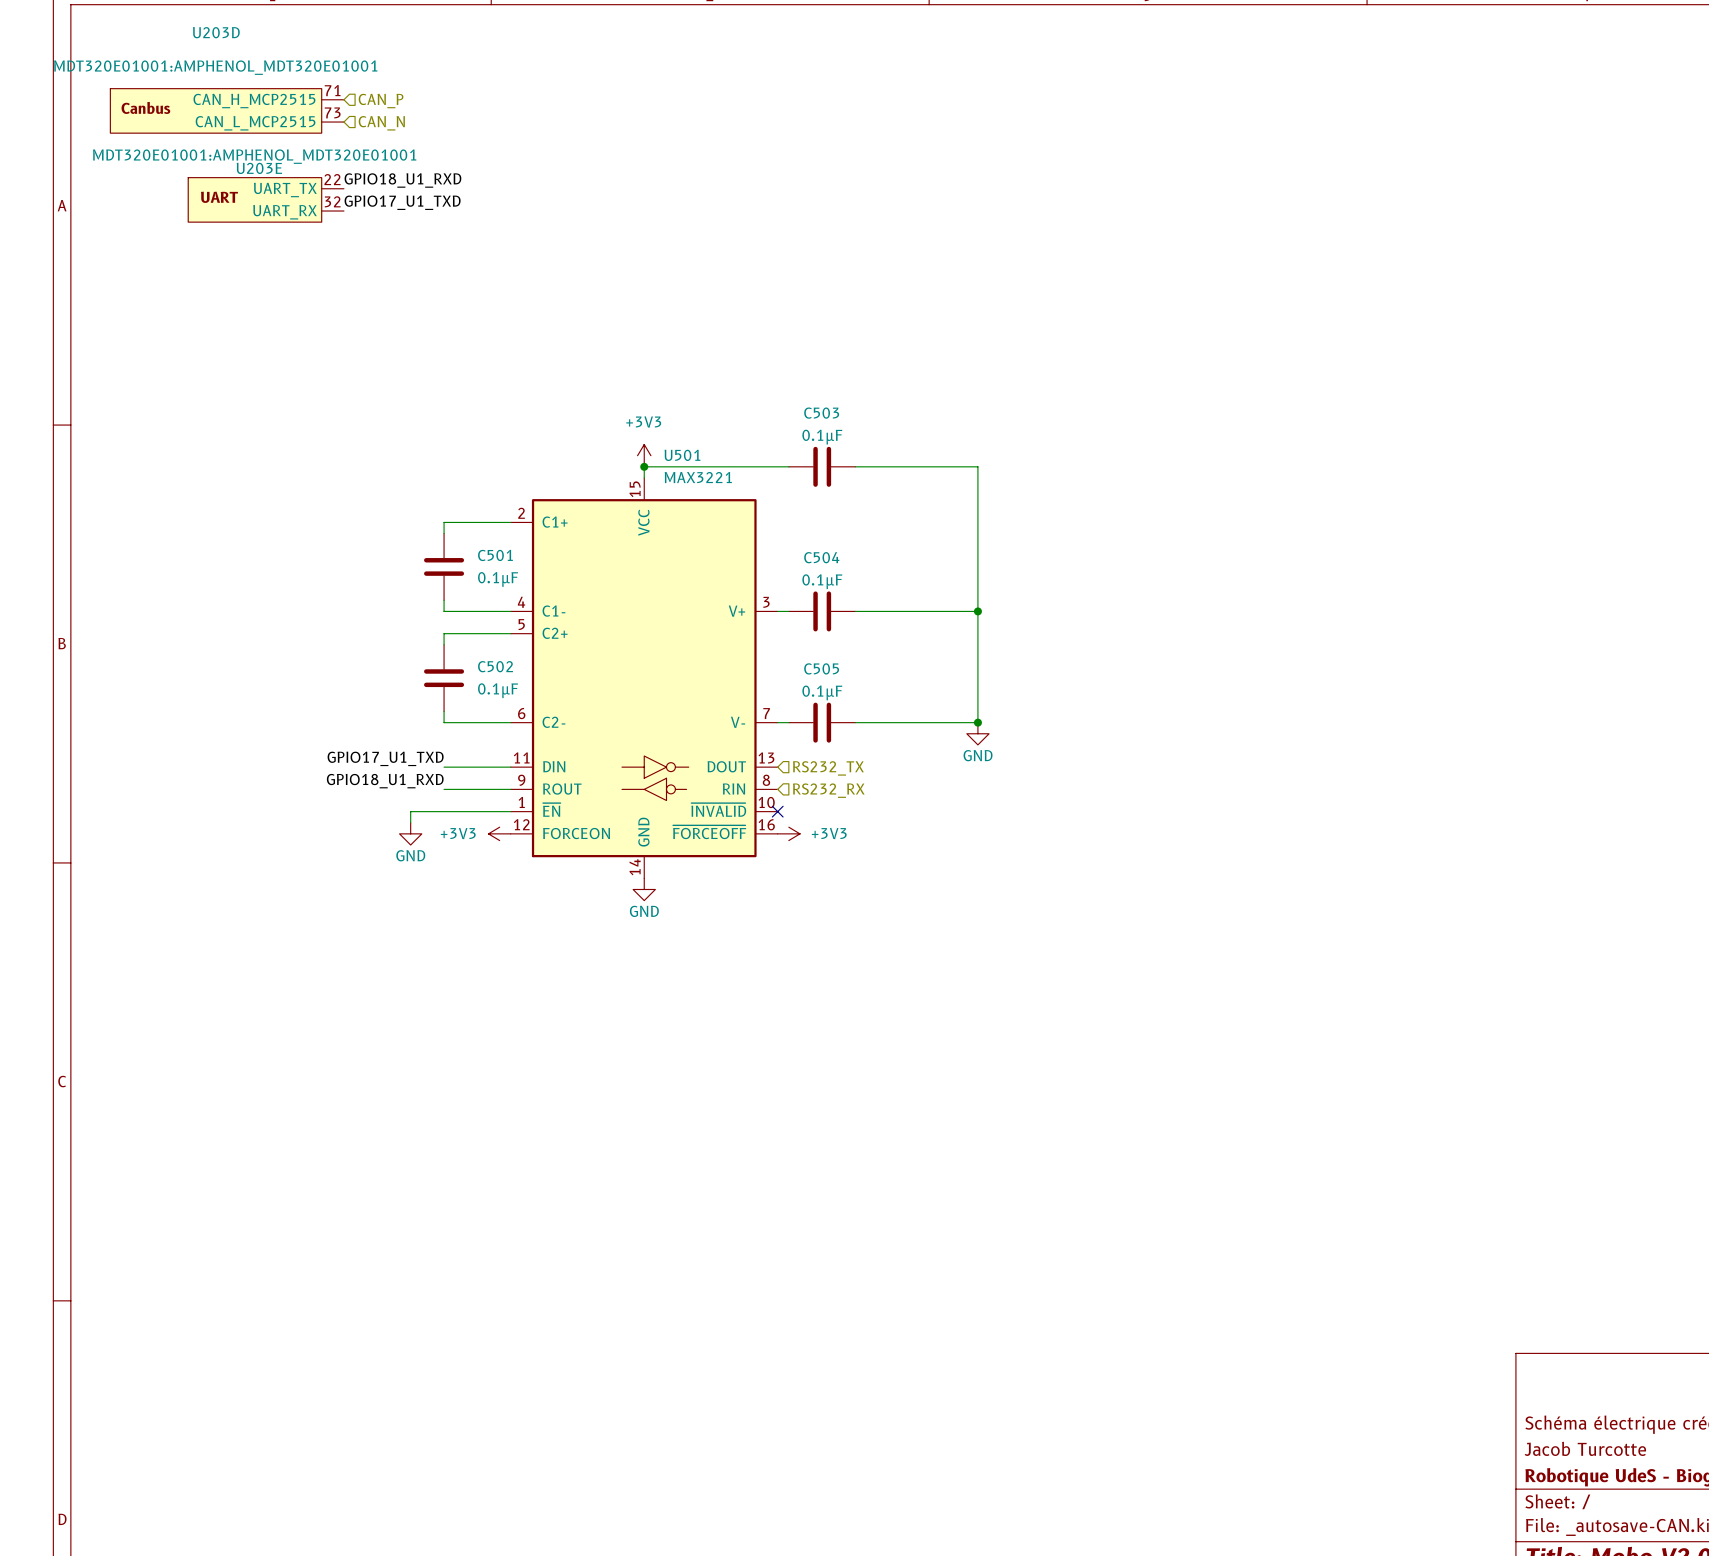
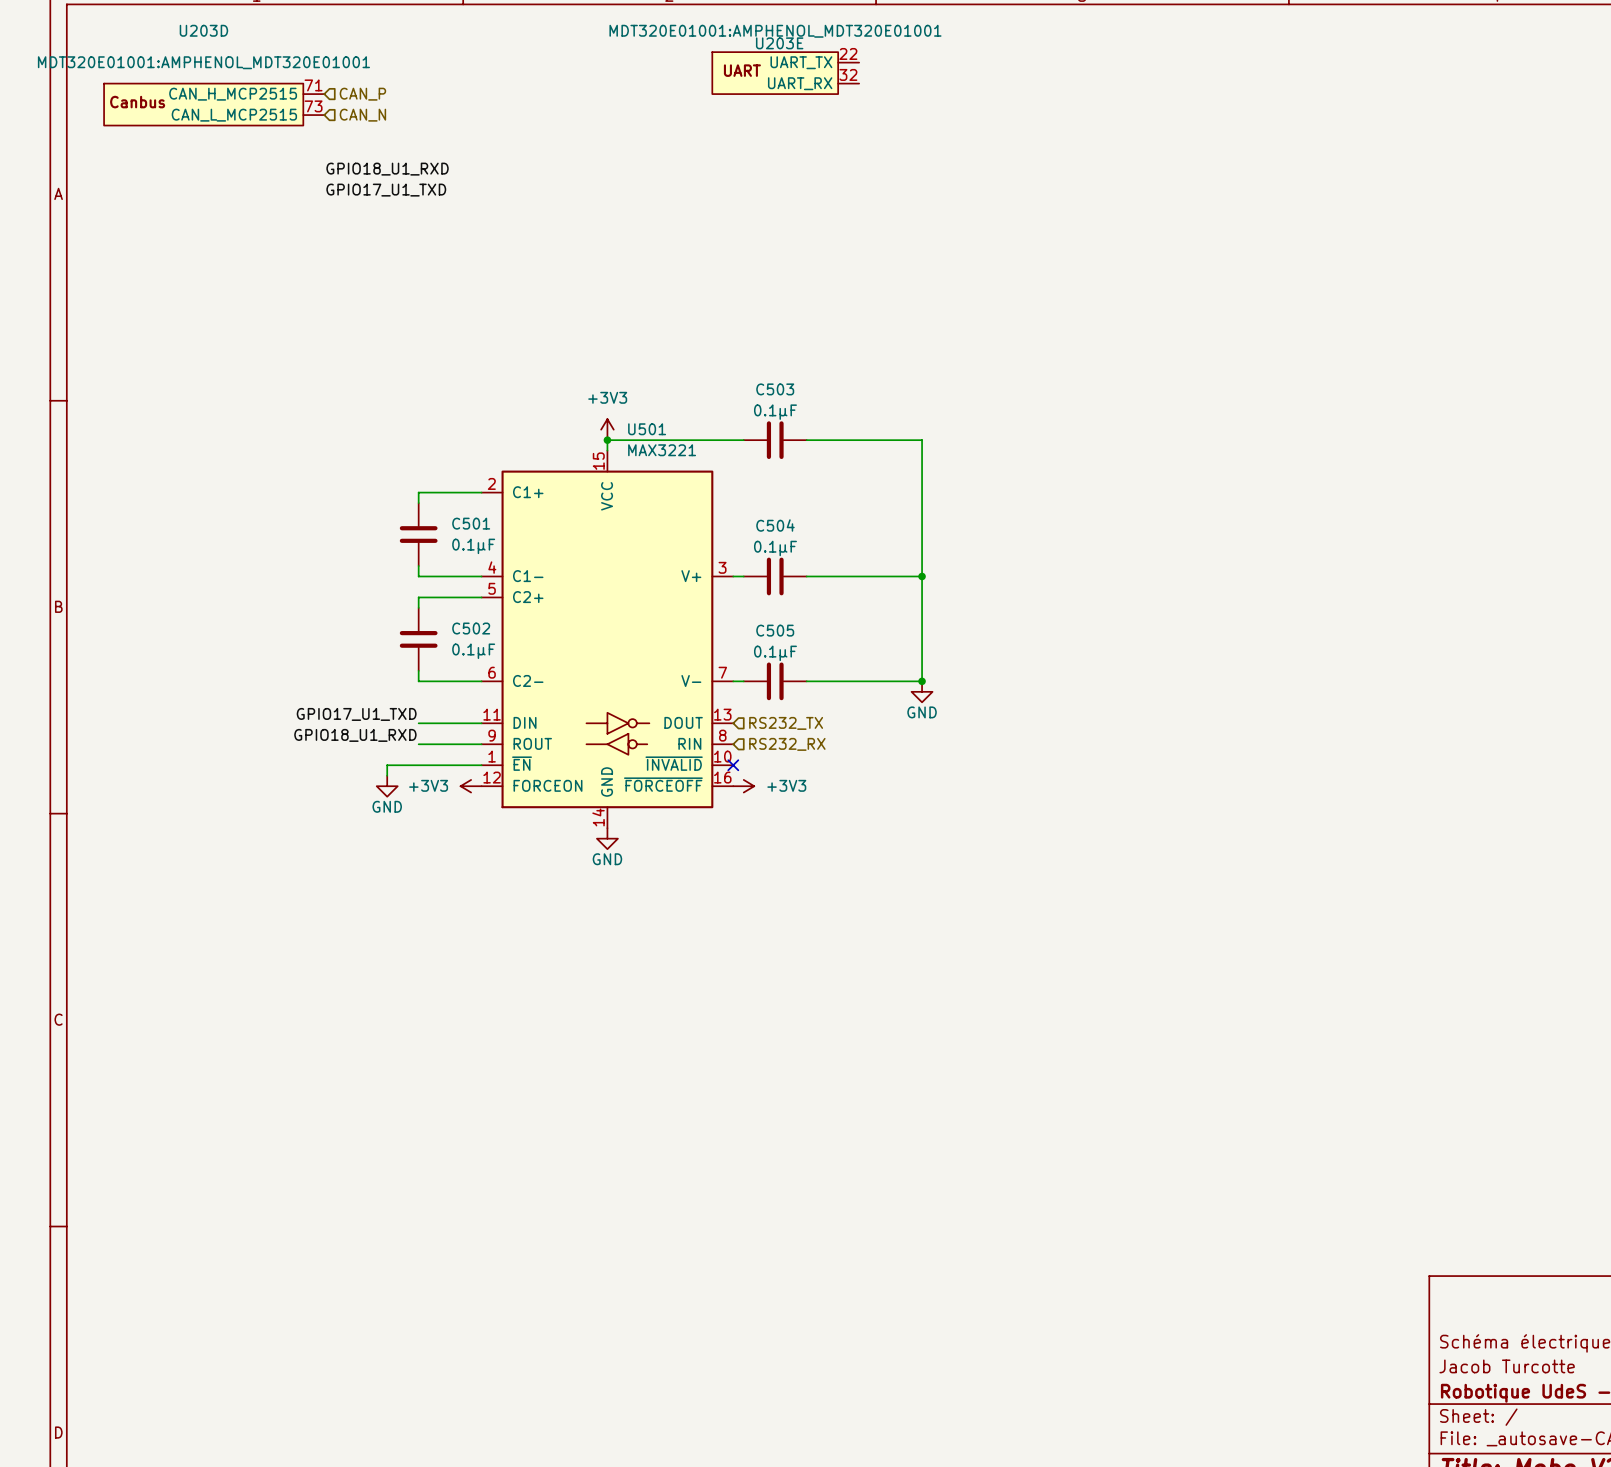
U203E position: (266, 199) -> (785, 73)

